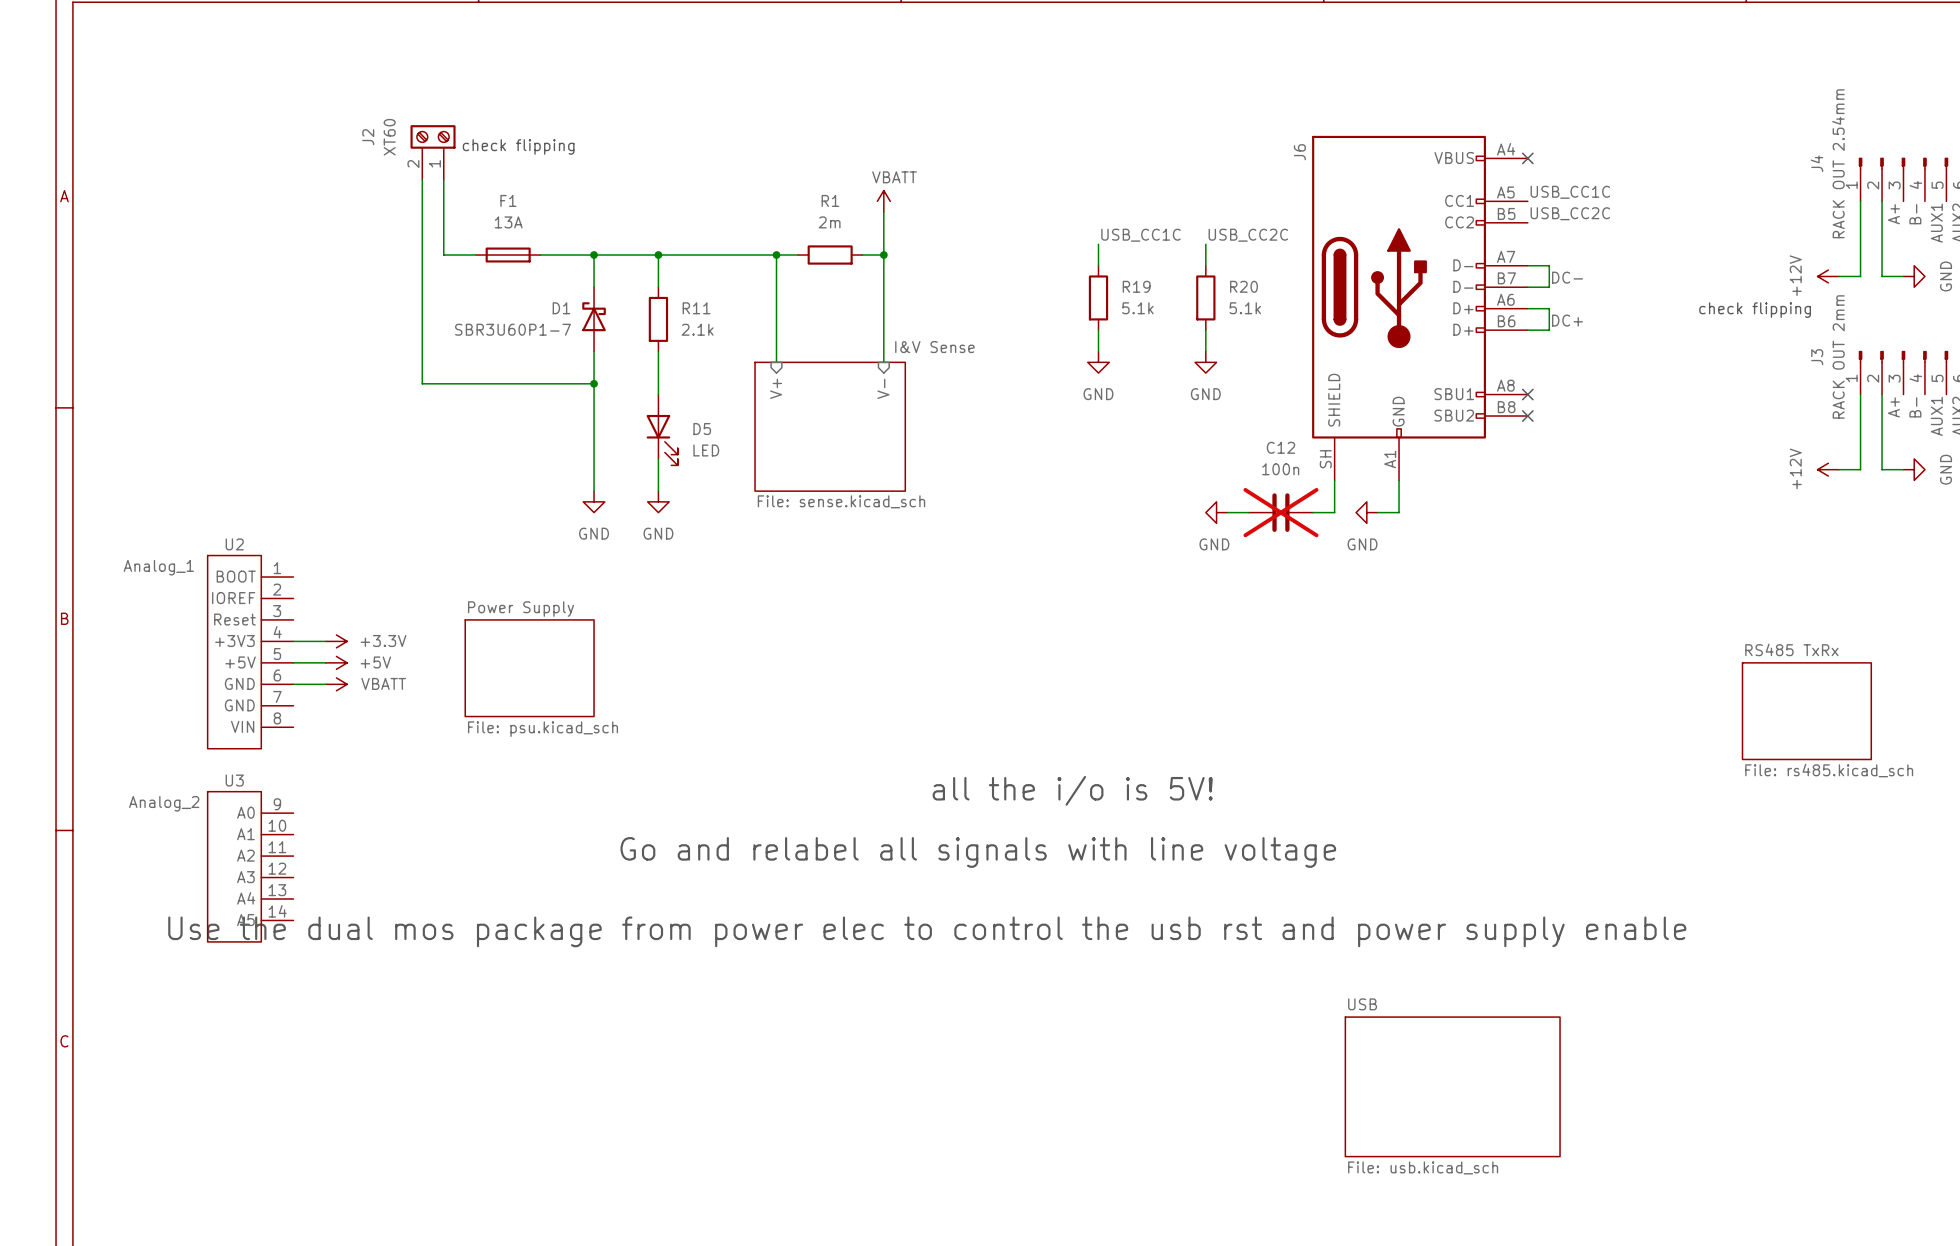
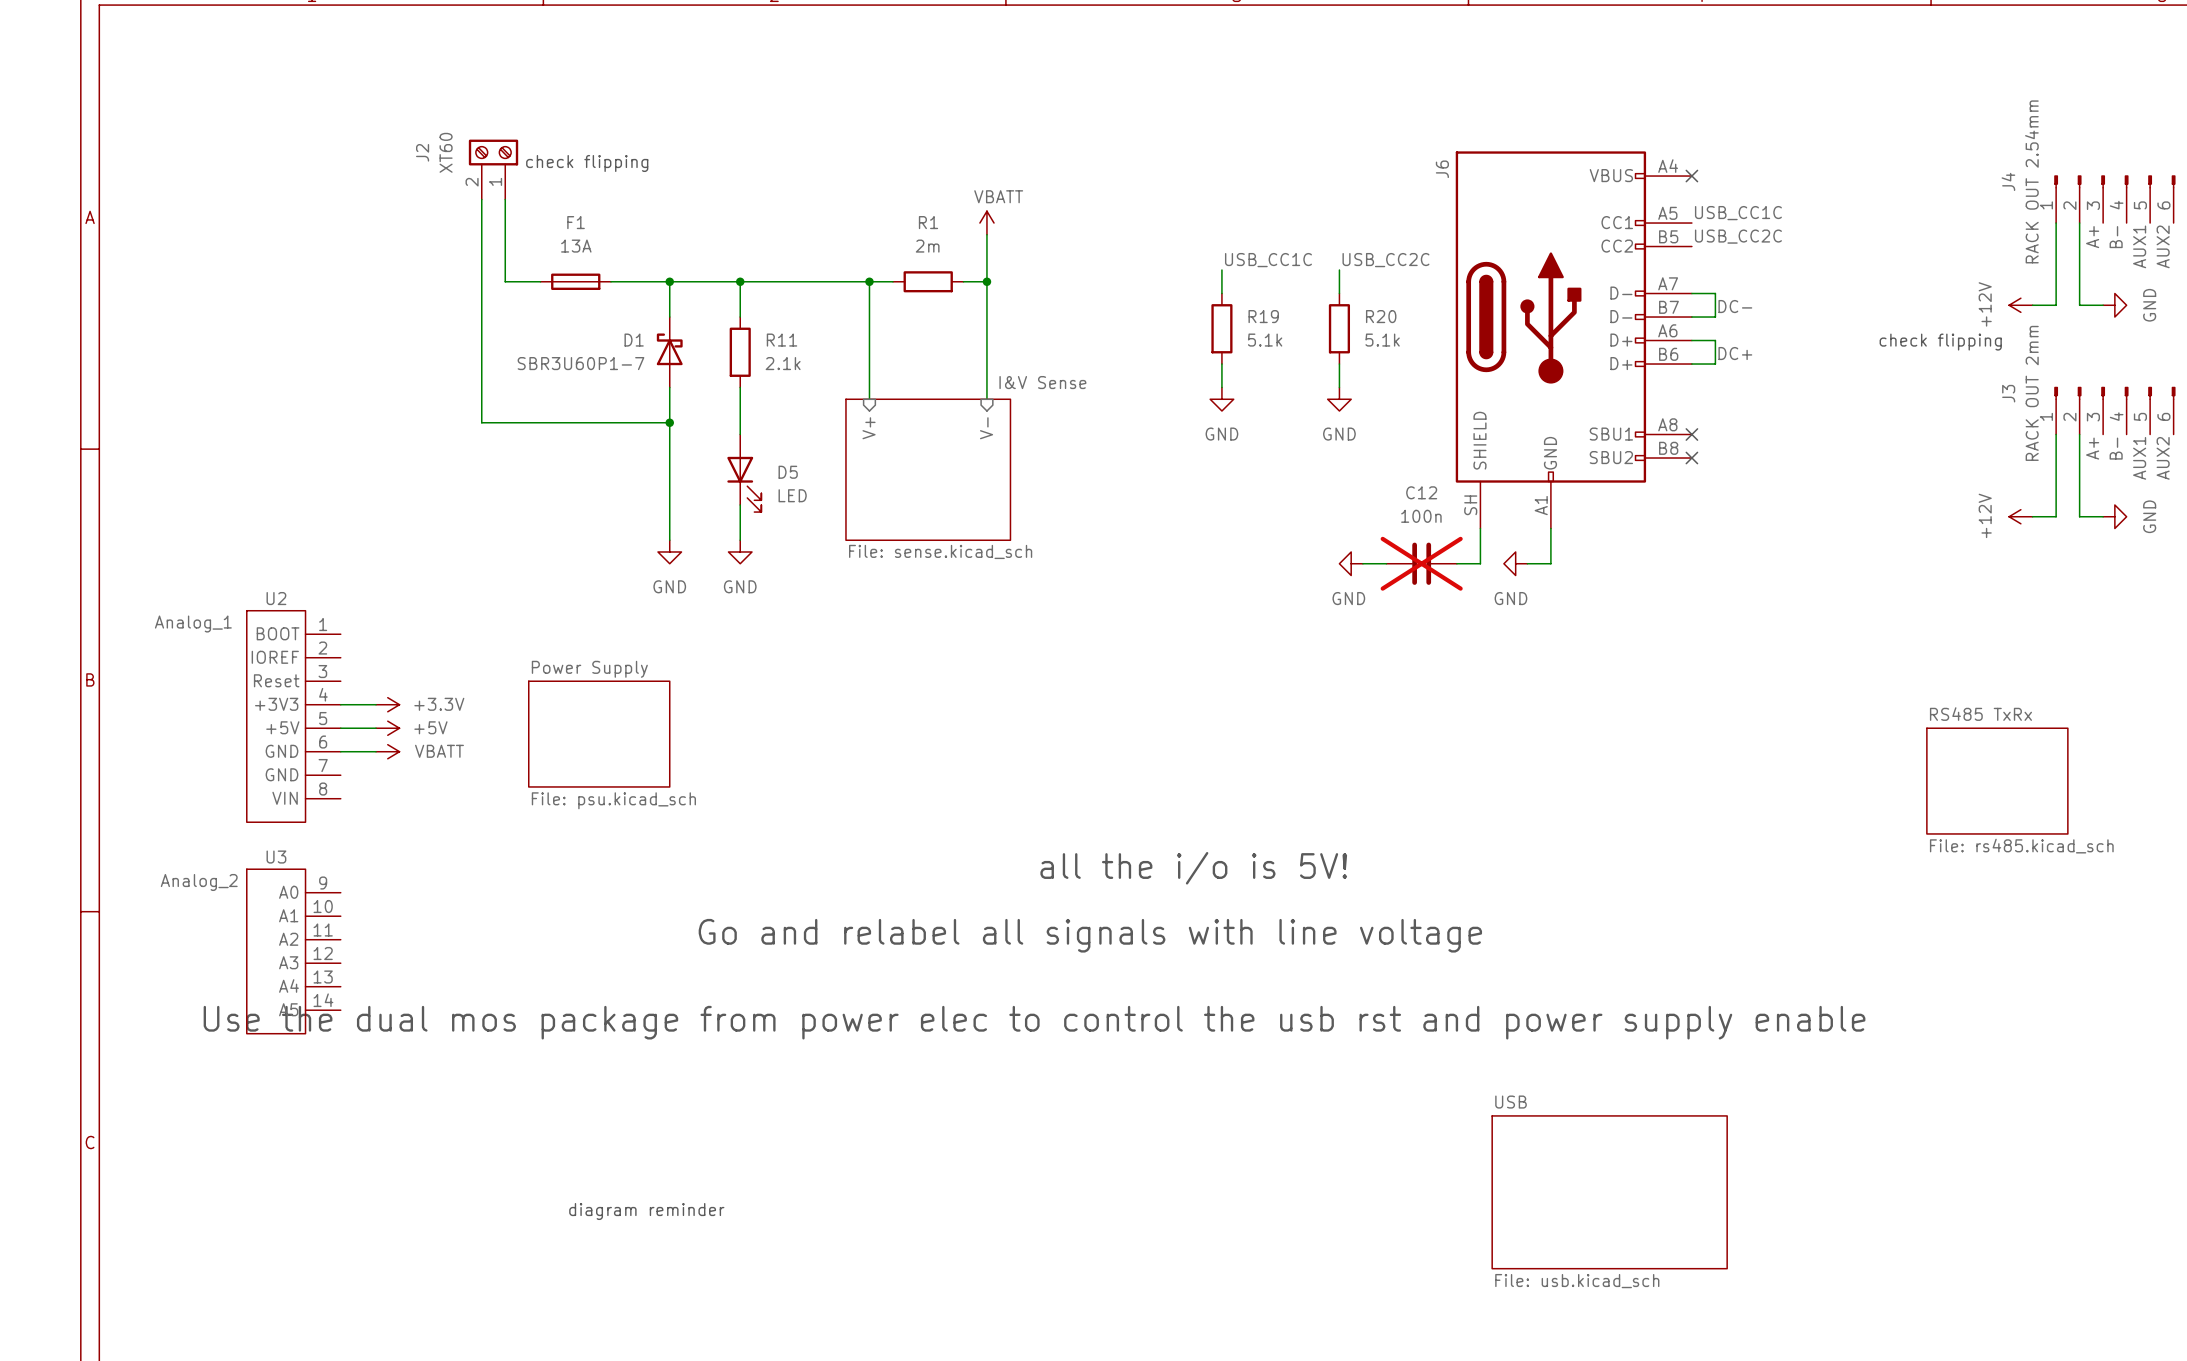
text: none -> diagram reminder (646, 1211)

